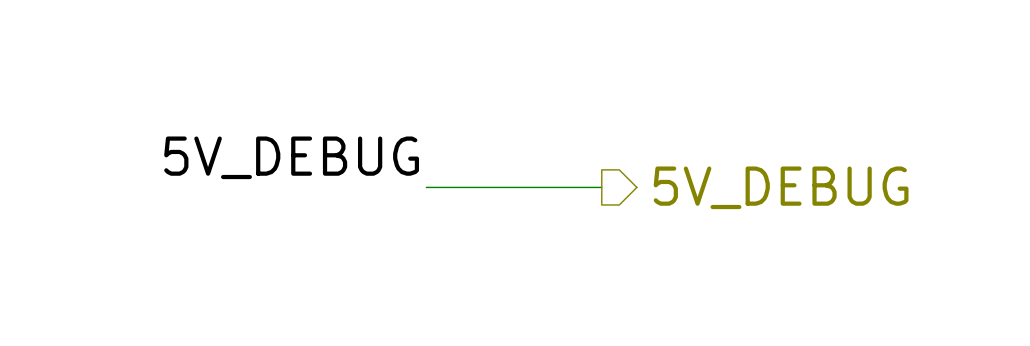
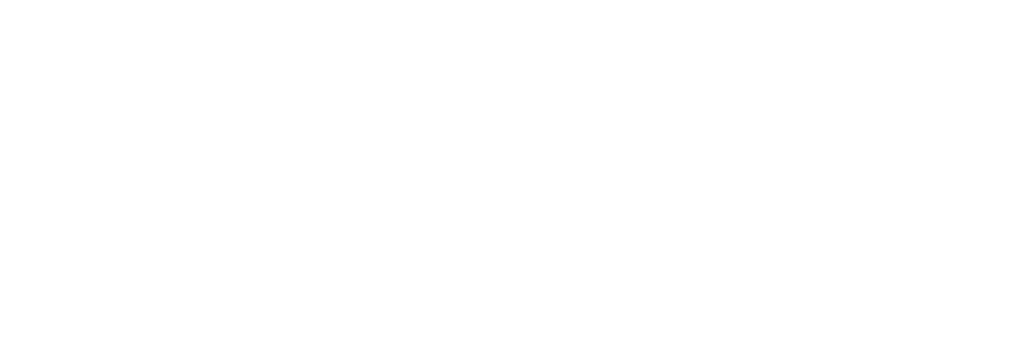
label: 5V_DEBUG (291, 157) -> none
wire: (426, 187) (601, 187) -> none
hierarchical label: 5V_DEBUG (781, 187) -> none

